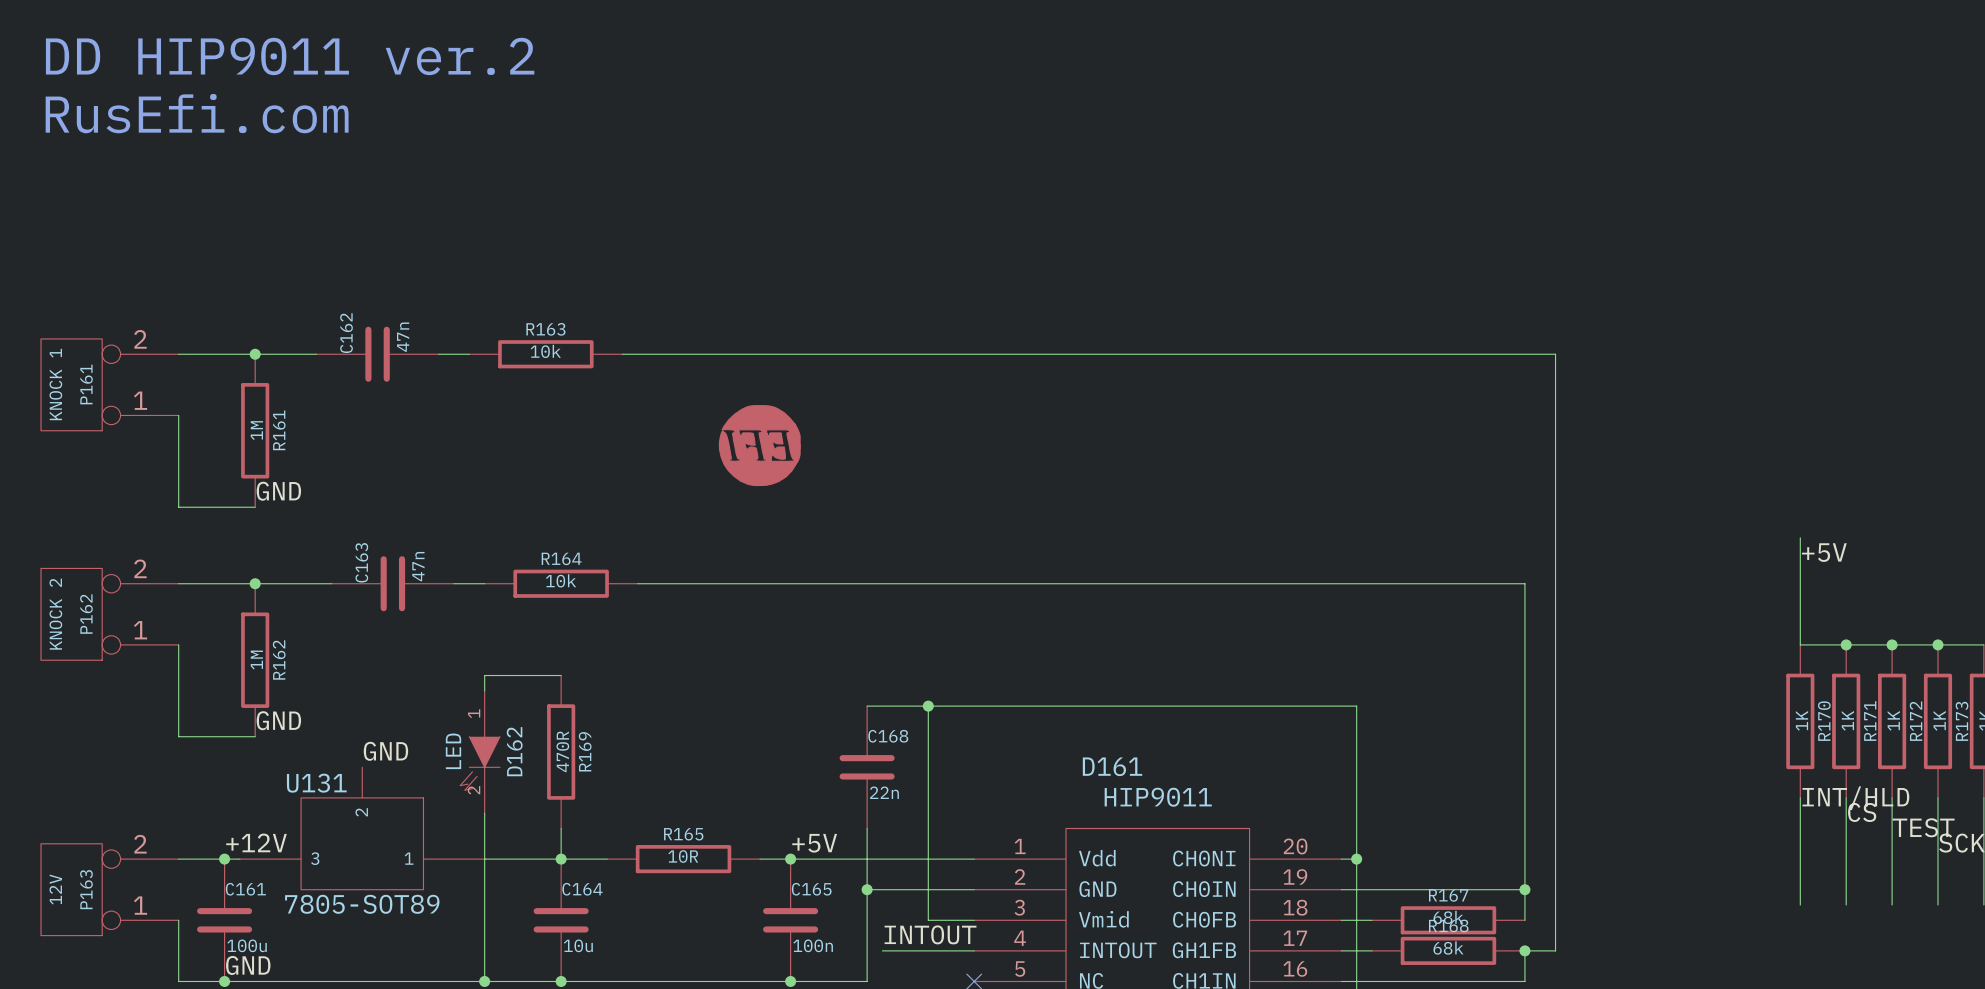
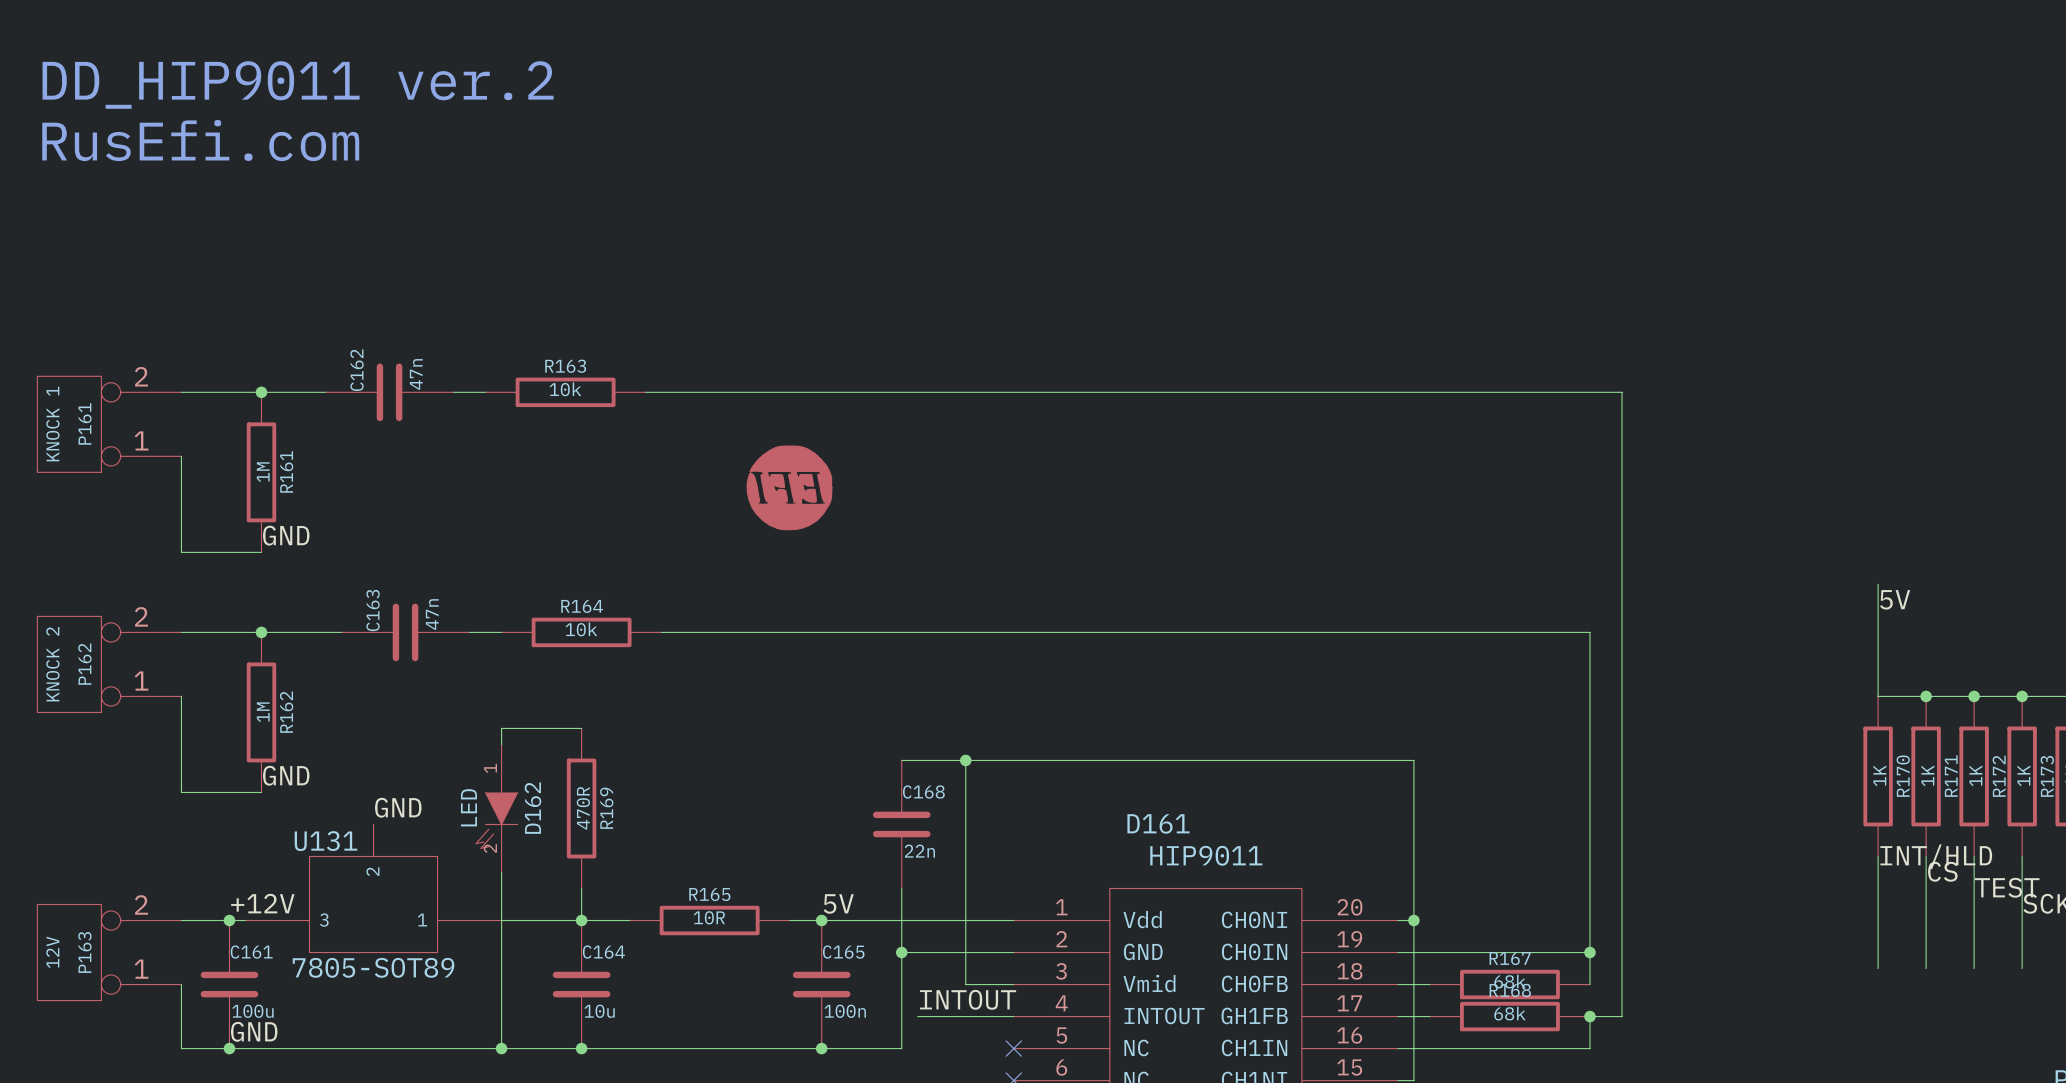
text: DD HIP9011 ver.2 (290, 56) -> DD_HIP9011 ver.2 (298, 85)
label: +5V (1824, 552) -> 5V (1895, 599)
label: +5V (814, 843) -> 5V (838, 903)

